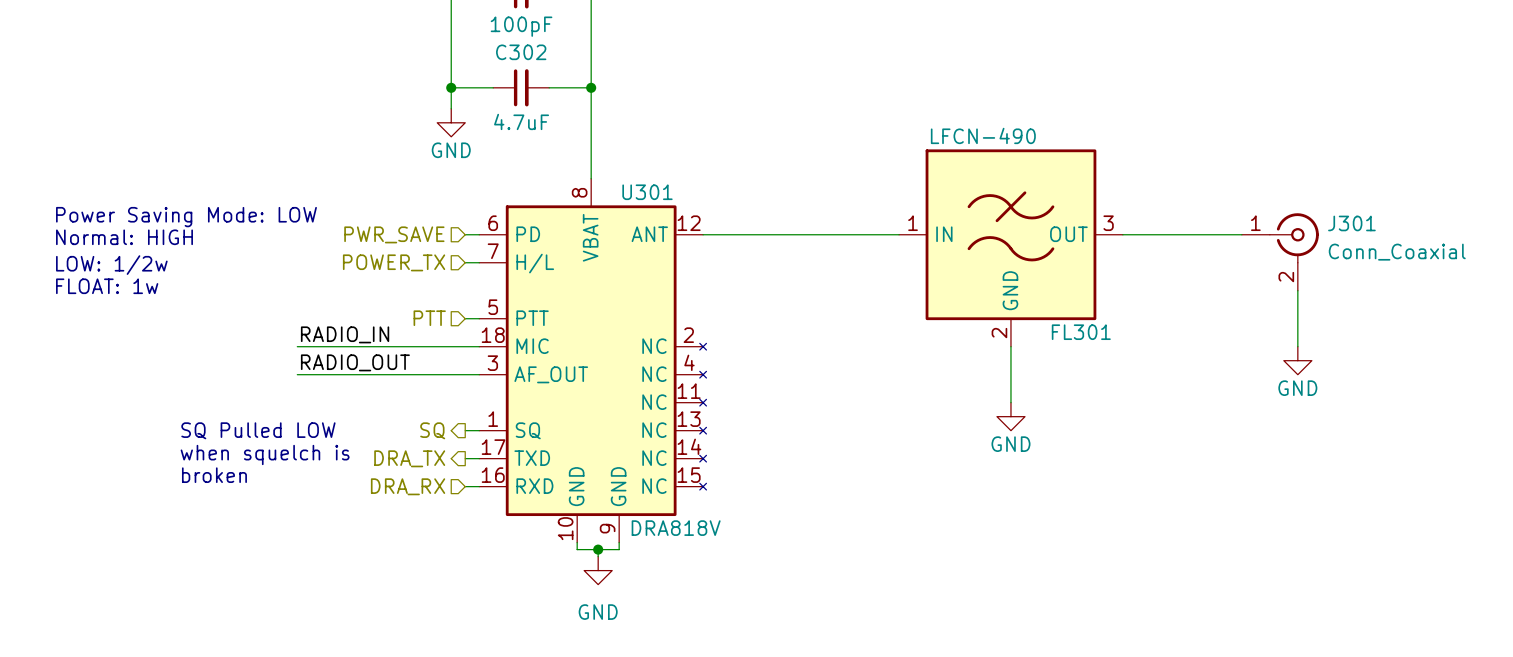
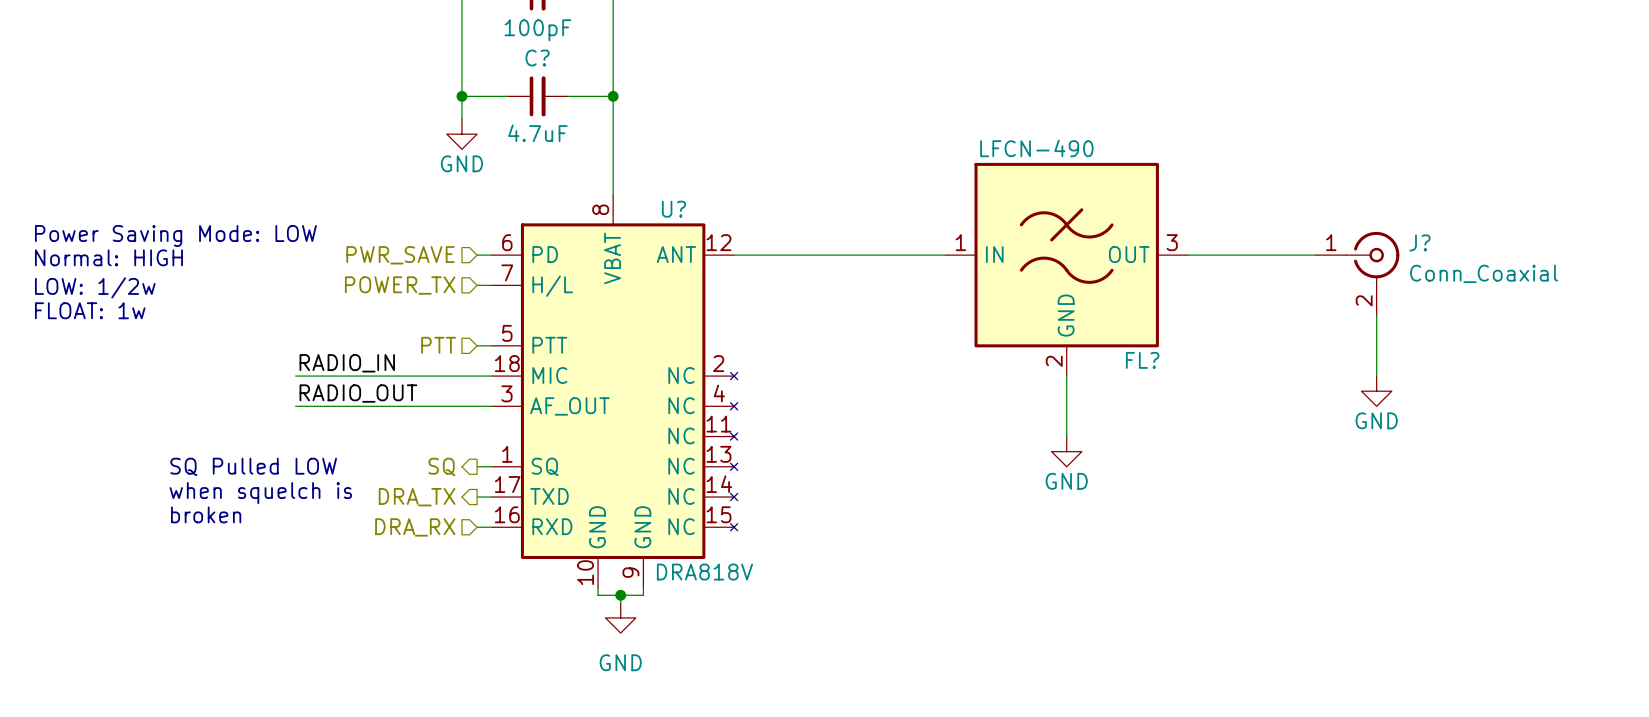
C302 name: C302 (521, 52) -> C? (537, 58)
U301 name: U301 (647, 192) -> U? (673, 209)
J301 name: J301 (1351, 223) -> J? (1419, 242)
FL301 name: FL301 (1081, 332) -> FL? (1142, 360)

